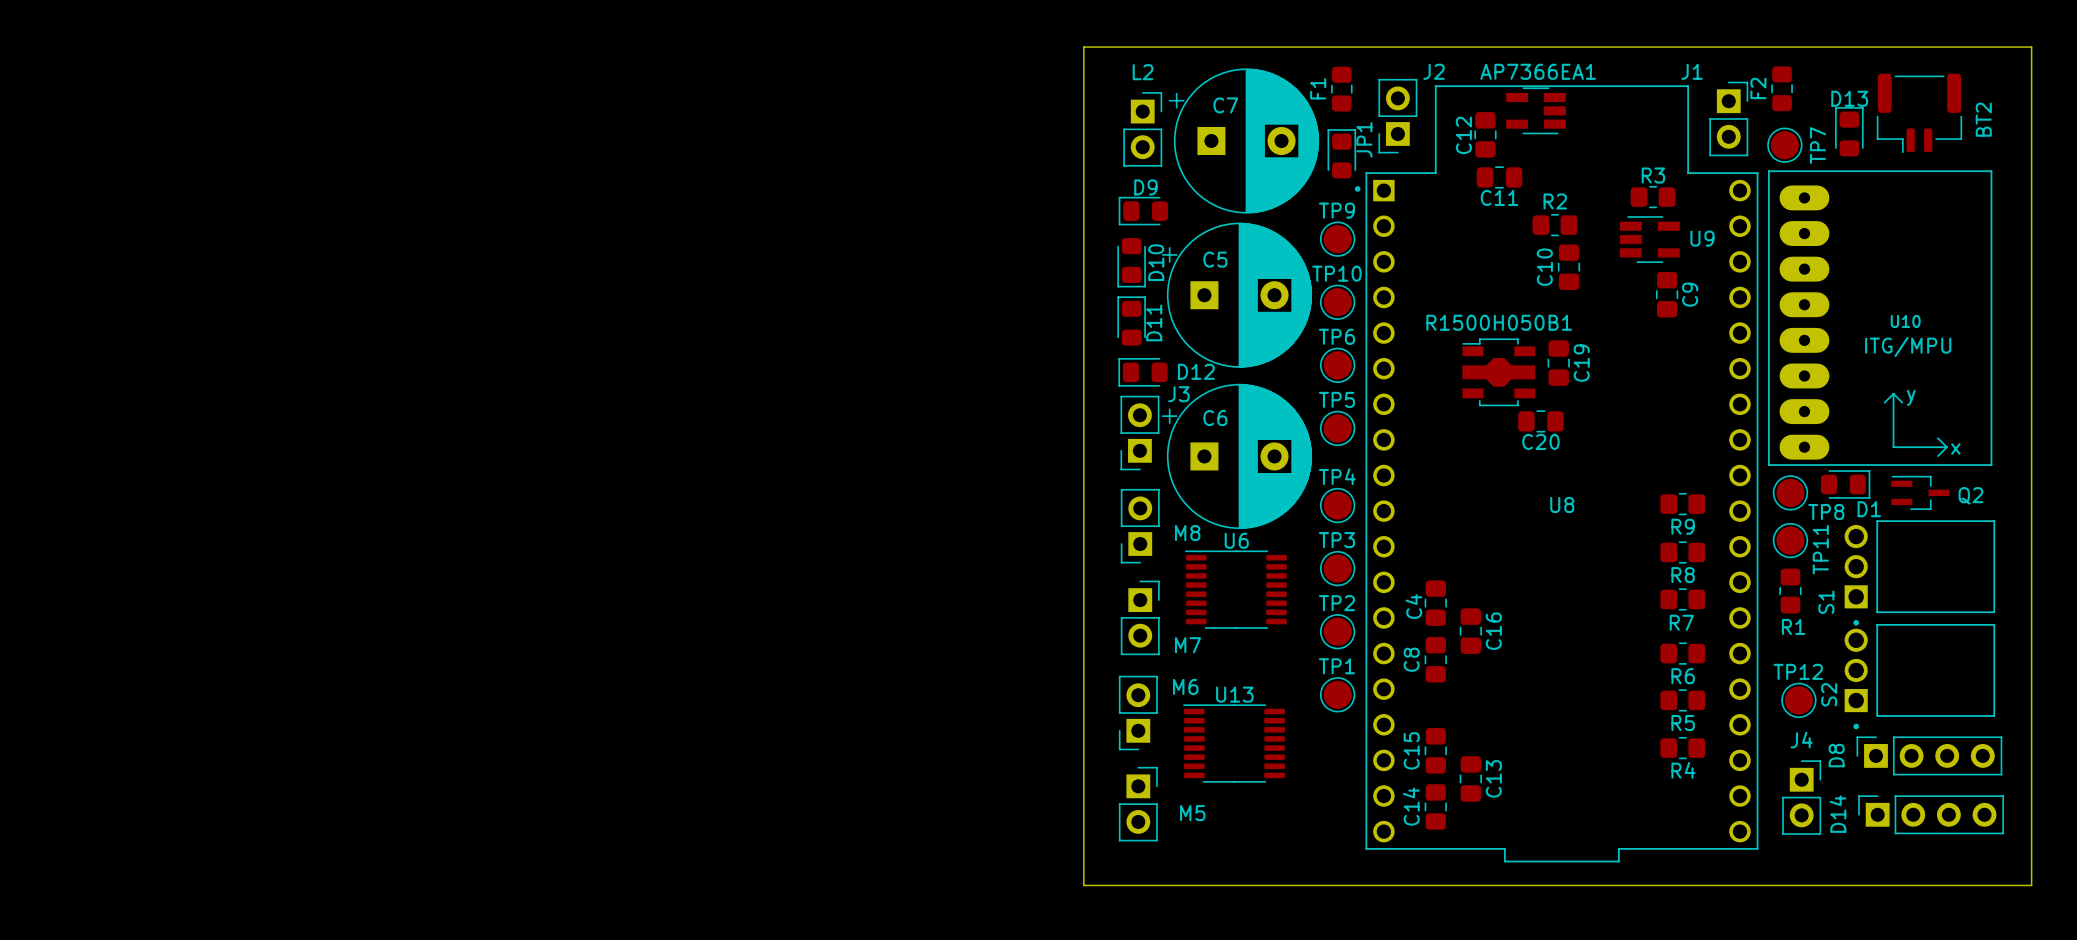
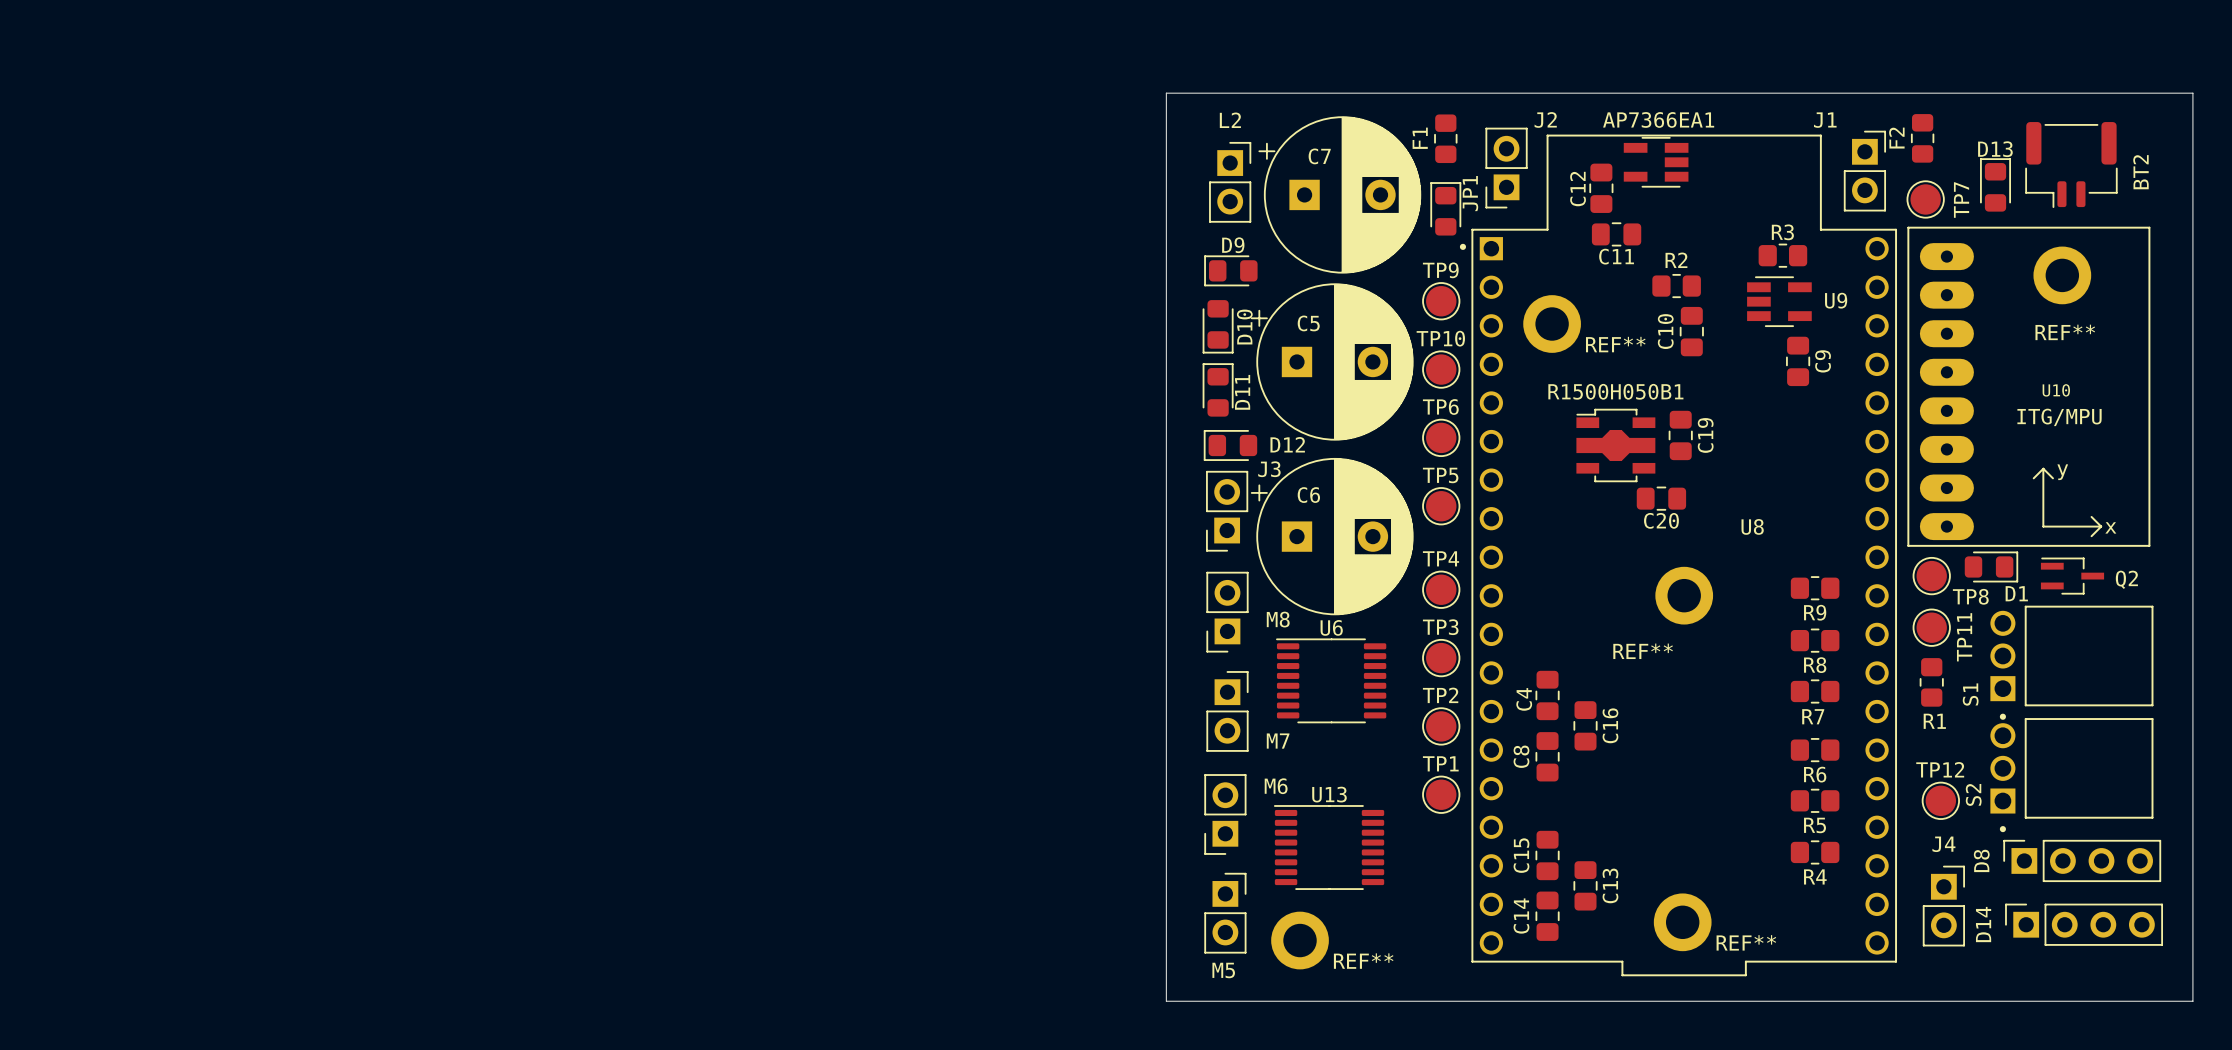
REF**: none -> (2062, 275)
REF**: none -> (1552, 324)
U8 name position: U8 (1562, 504) -> U8 (1752, 526)
REF**: none -> (1684, 595)
REF**: none -> (1682, 922)
M5 name position: M5 (1192, 813) -> M5 (1223, 970)
REF**: none -> (1300, 940)

